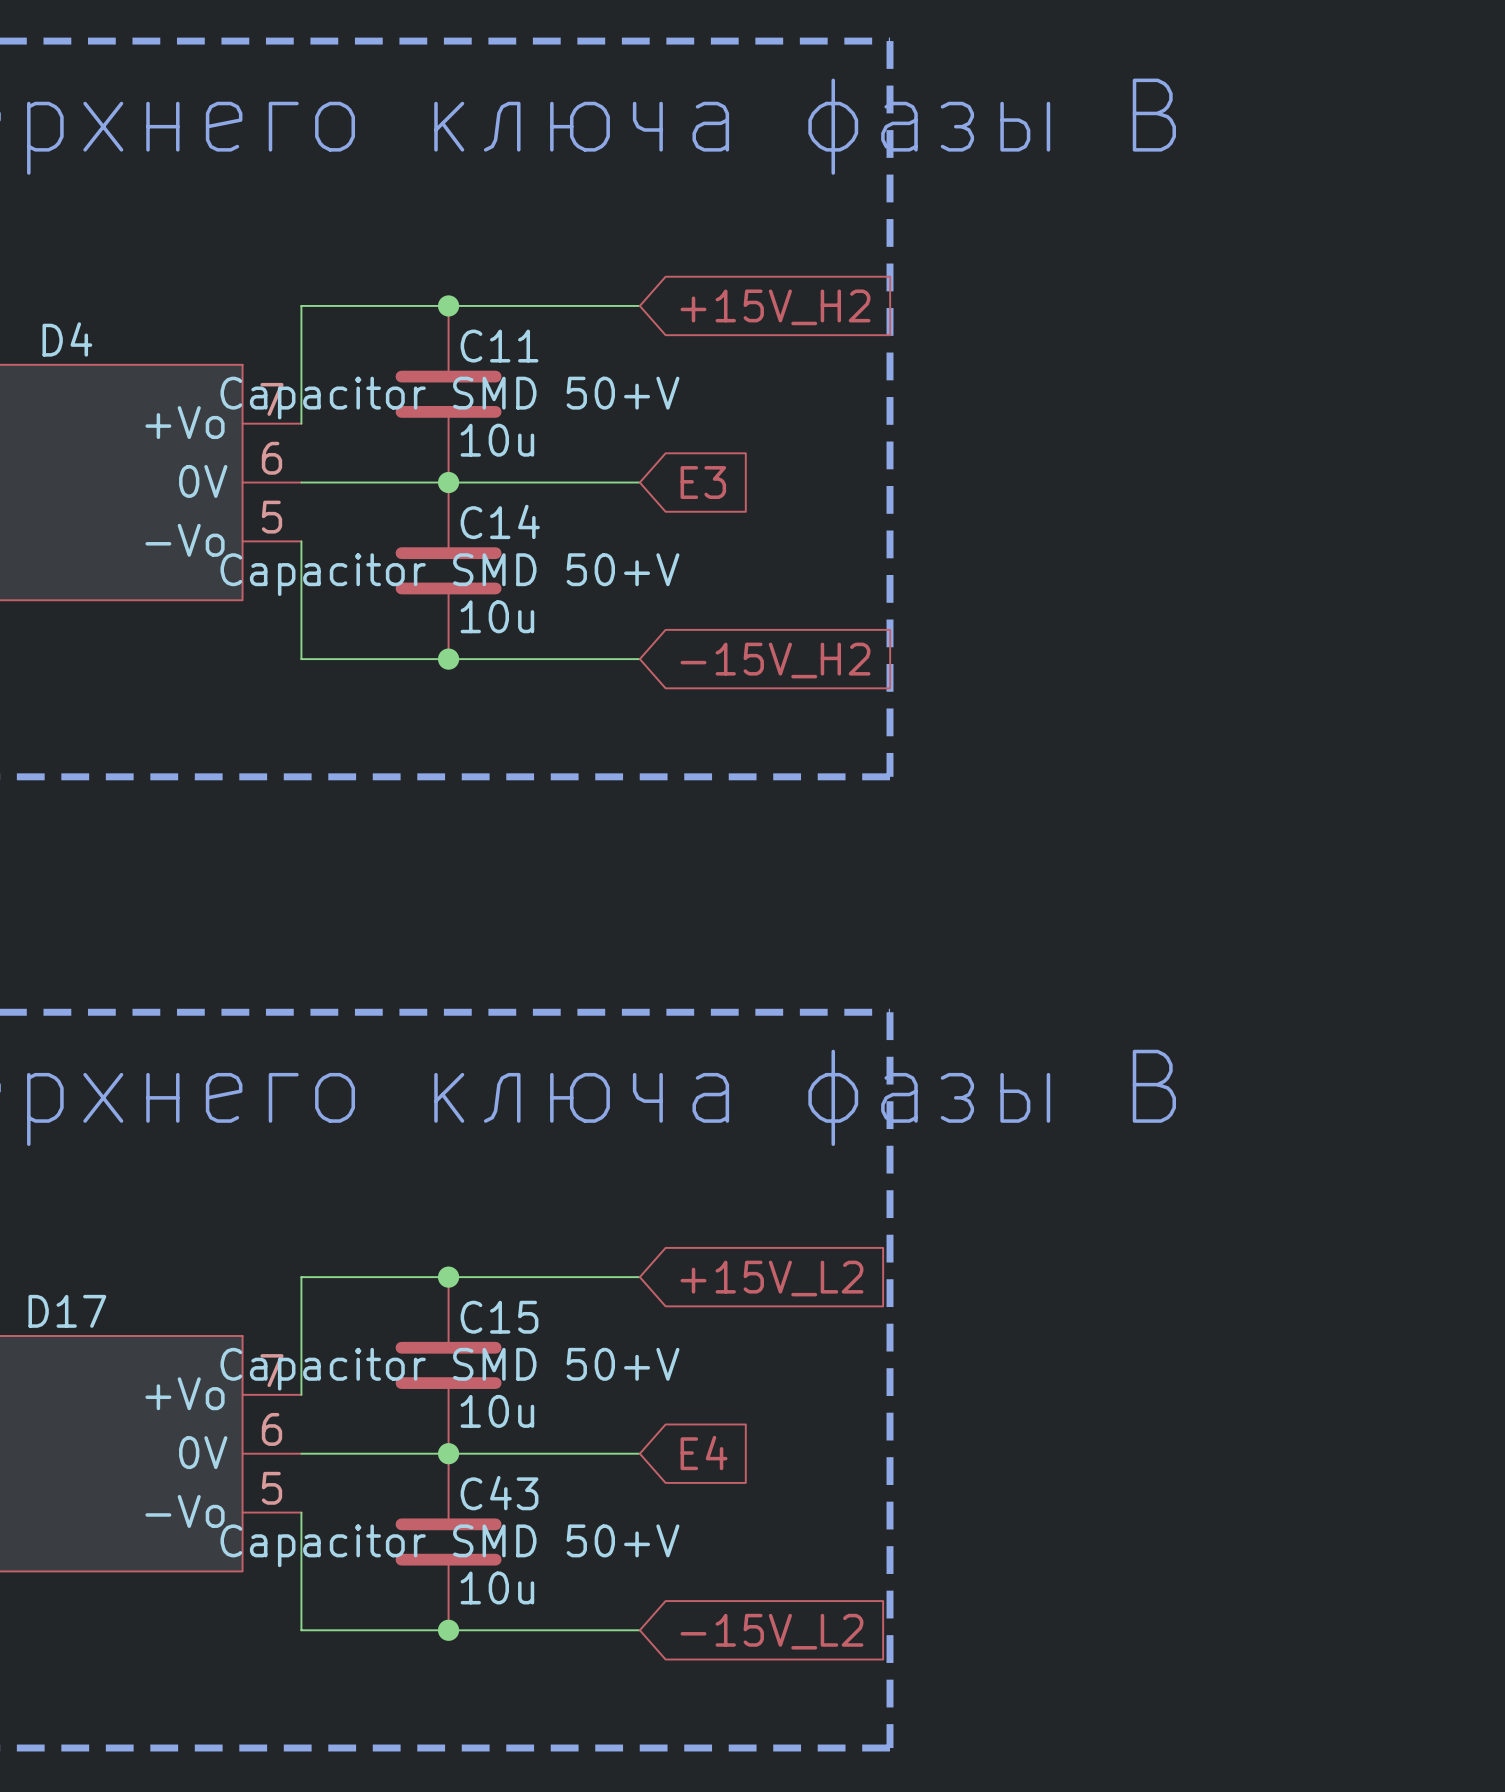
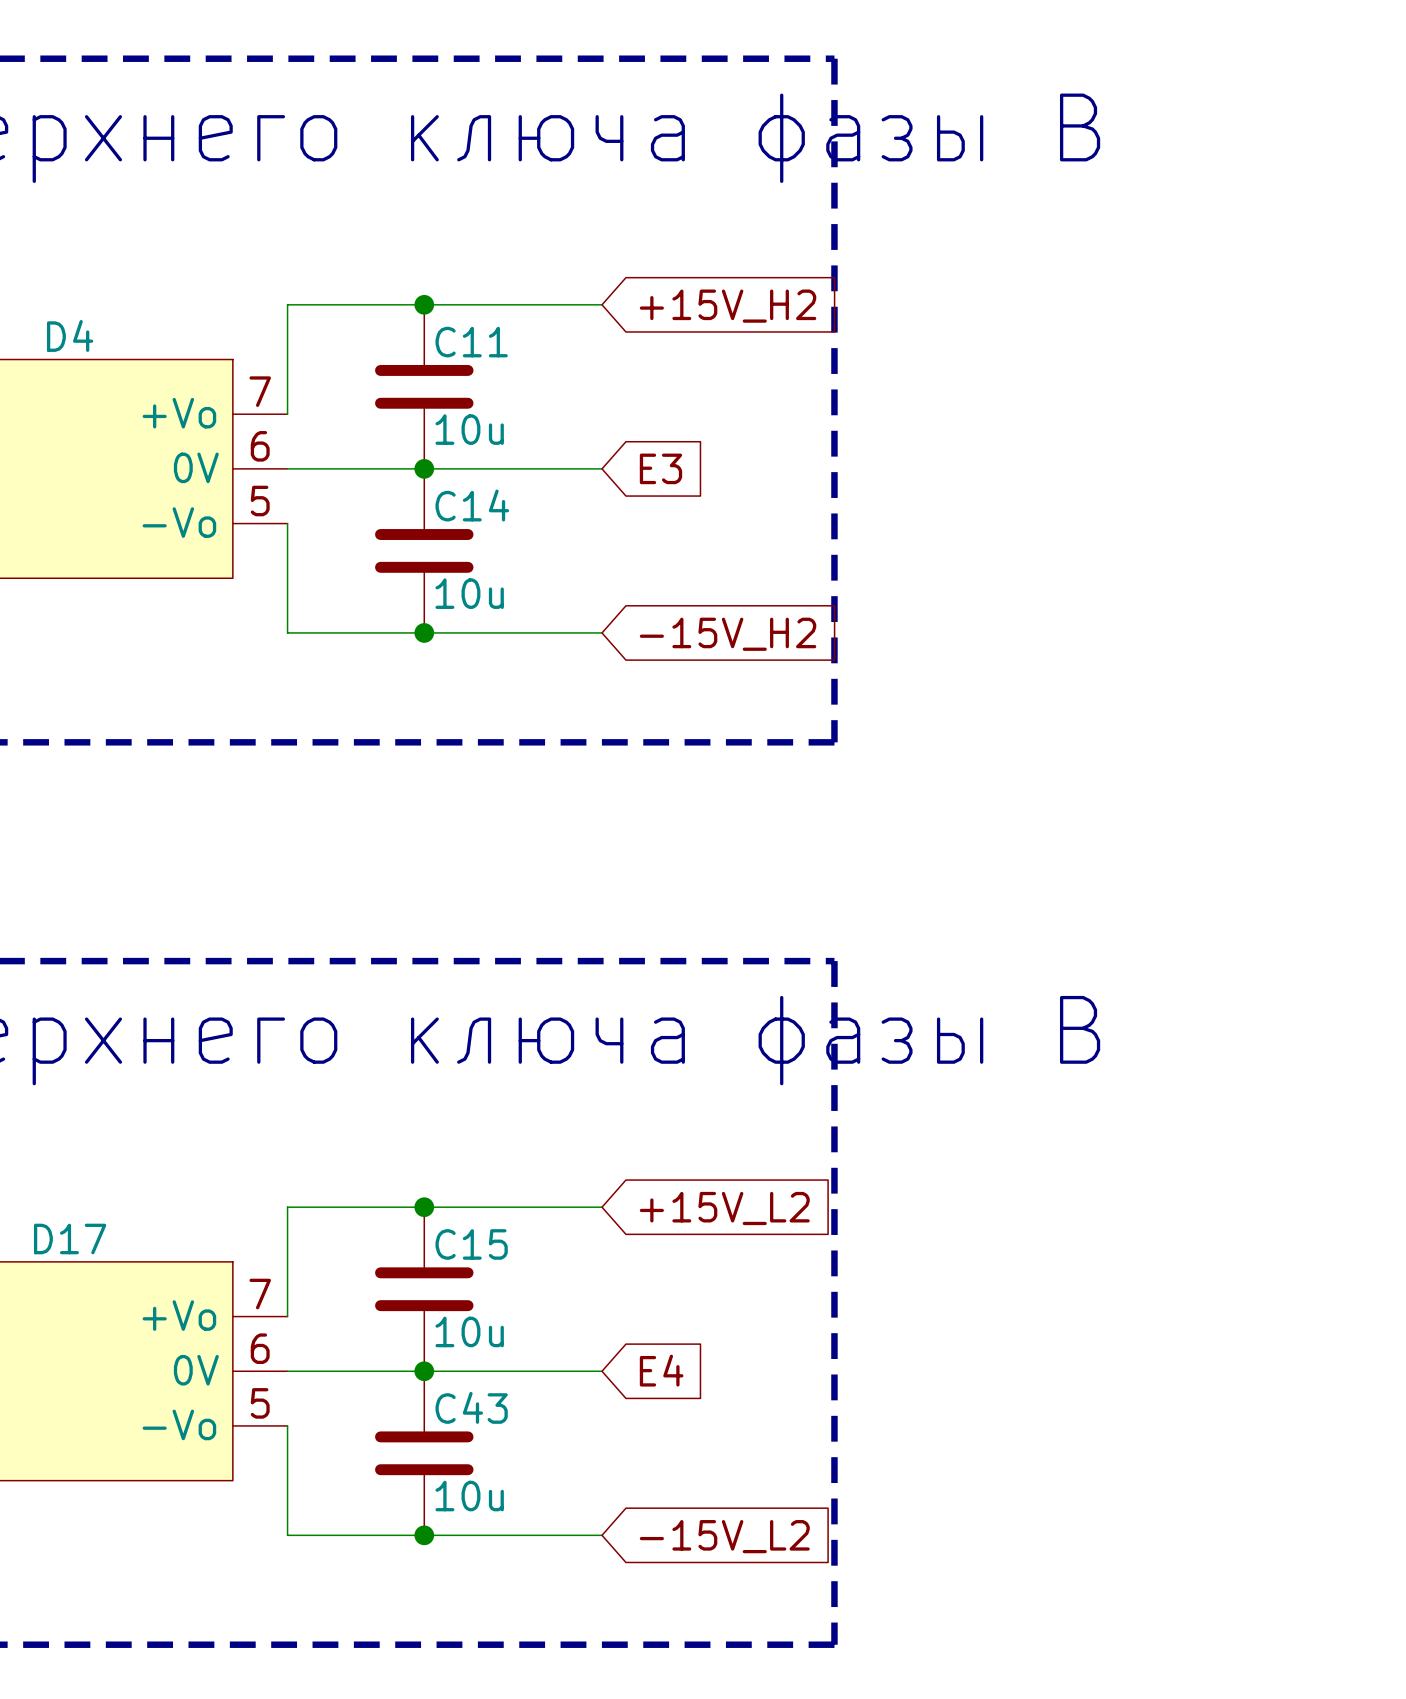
C11 text: Capacitor SMD 50+V (449, 398) -> none
C14 text: Capacitor SMD 50+V (449, 574) -> none
C15 text: Capacitor SMD 50+V (449, 1369) -> none
C43 text: Capacitor SMD 50+V (449, 1545) -> none

